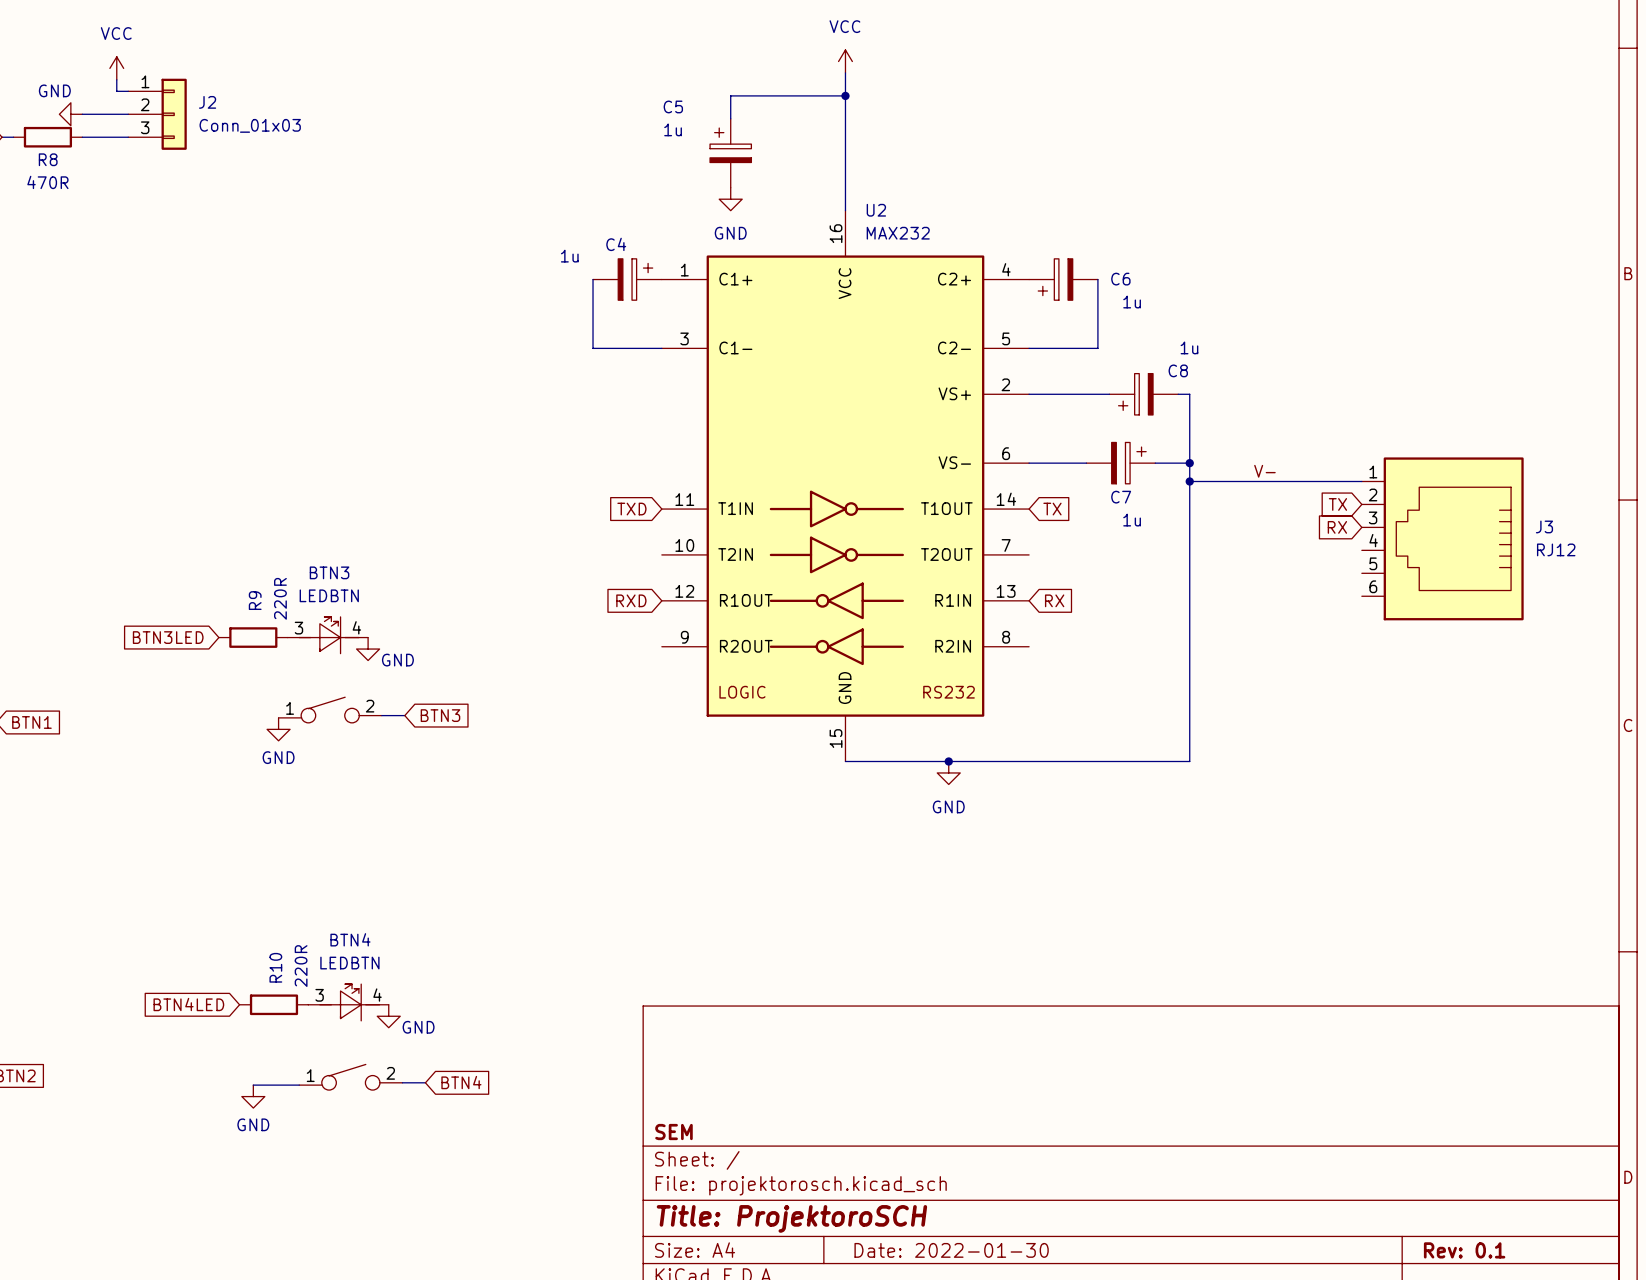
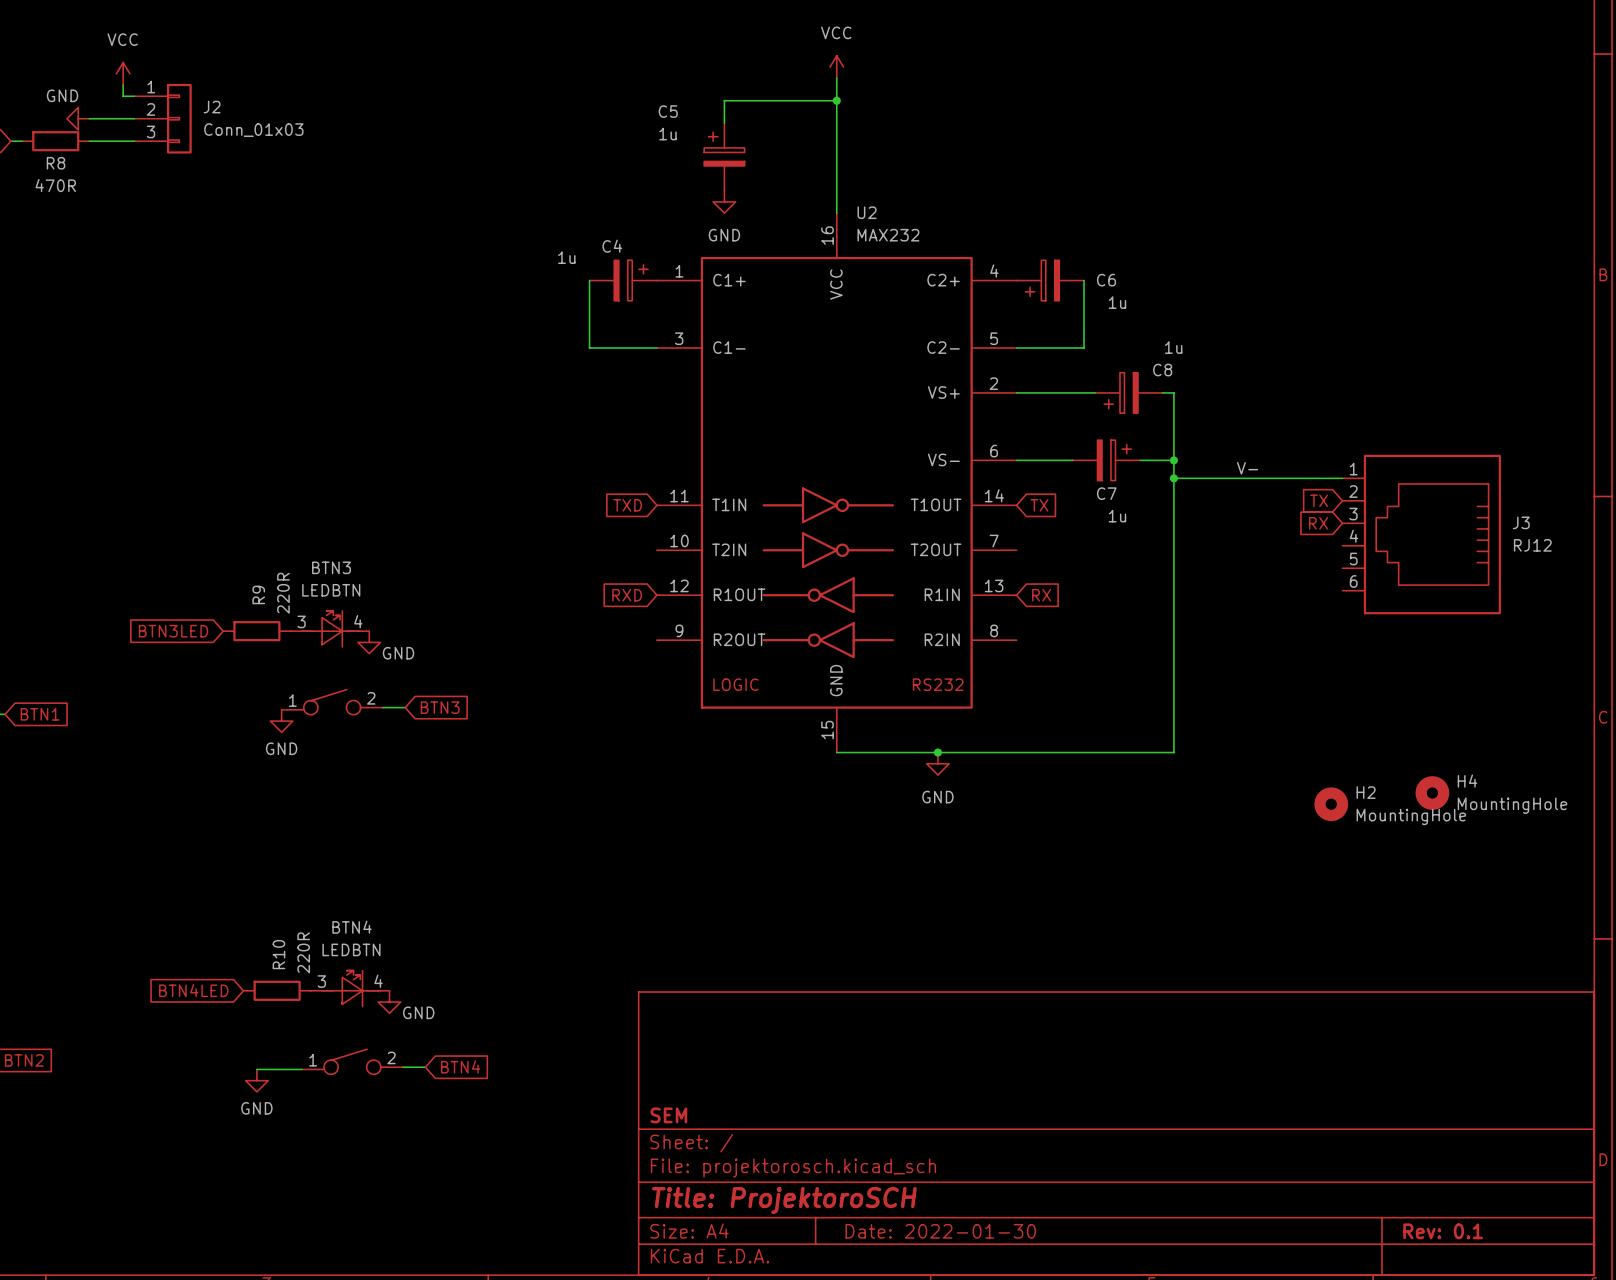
H4: none -> MountingHole (1432, 793)
H2: none -> MountingHole (1331, 804)

